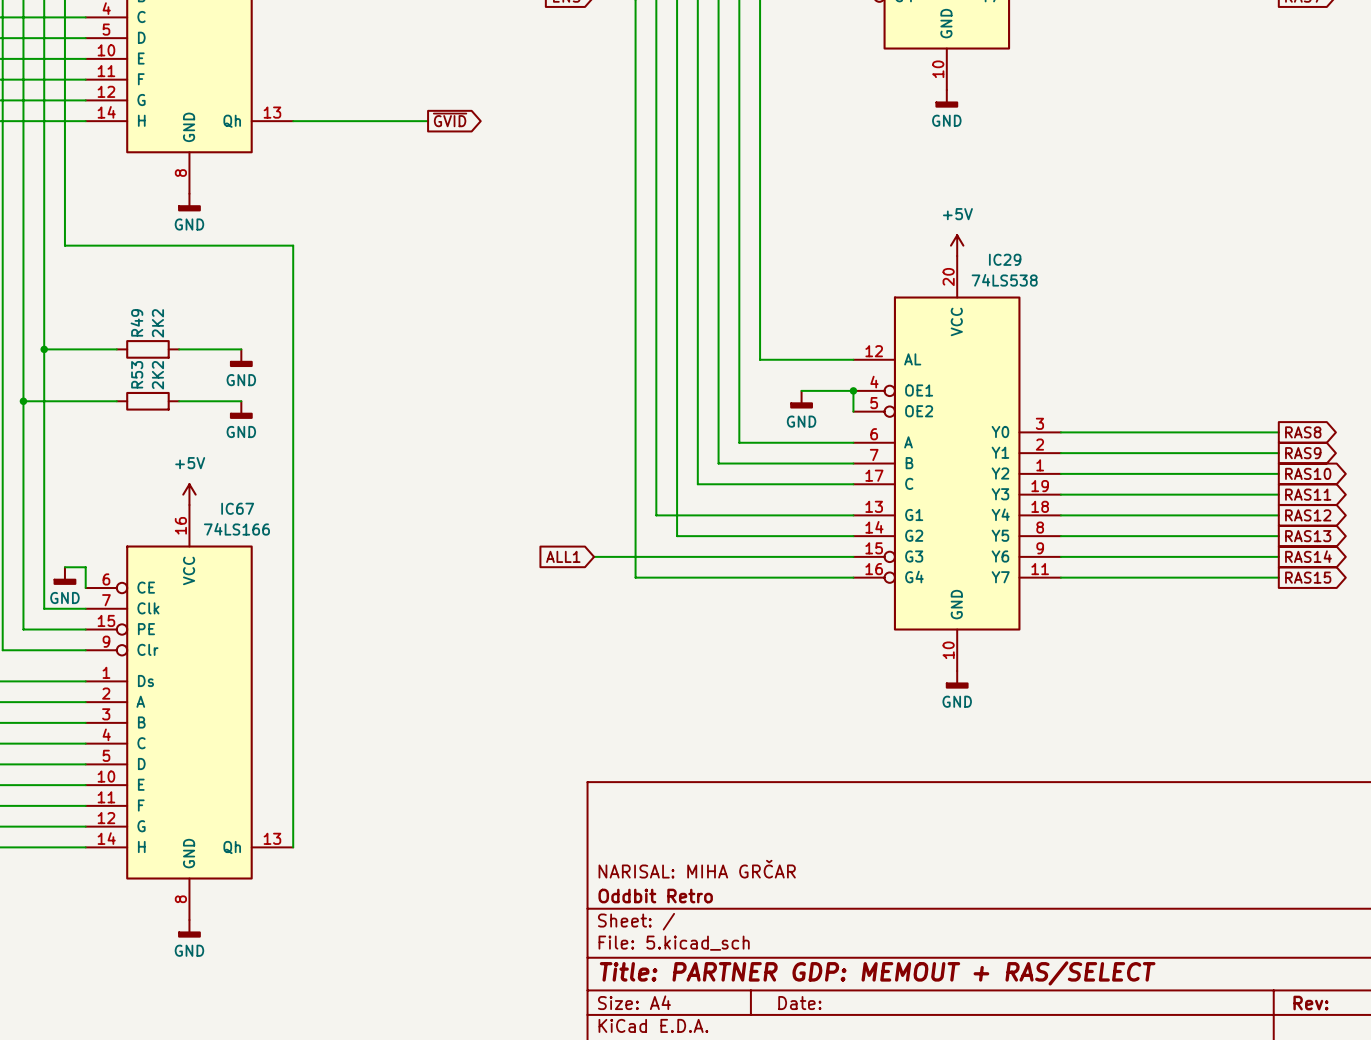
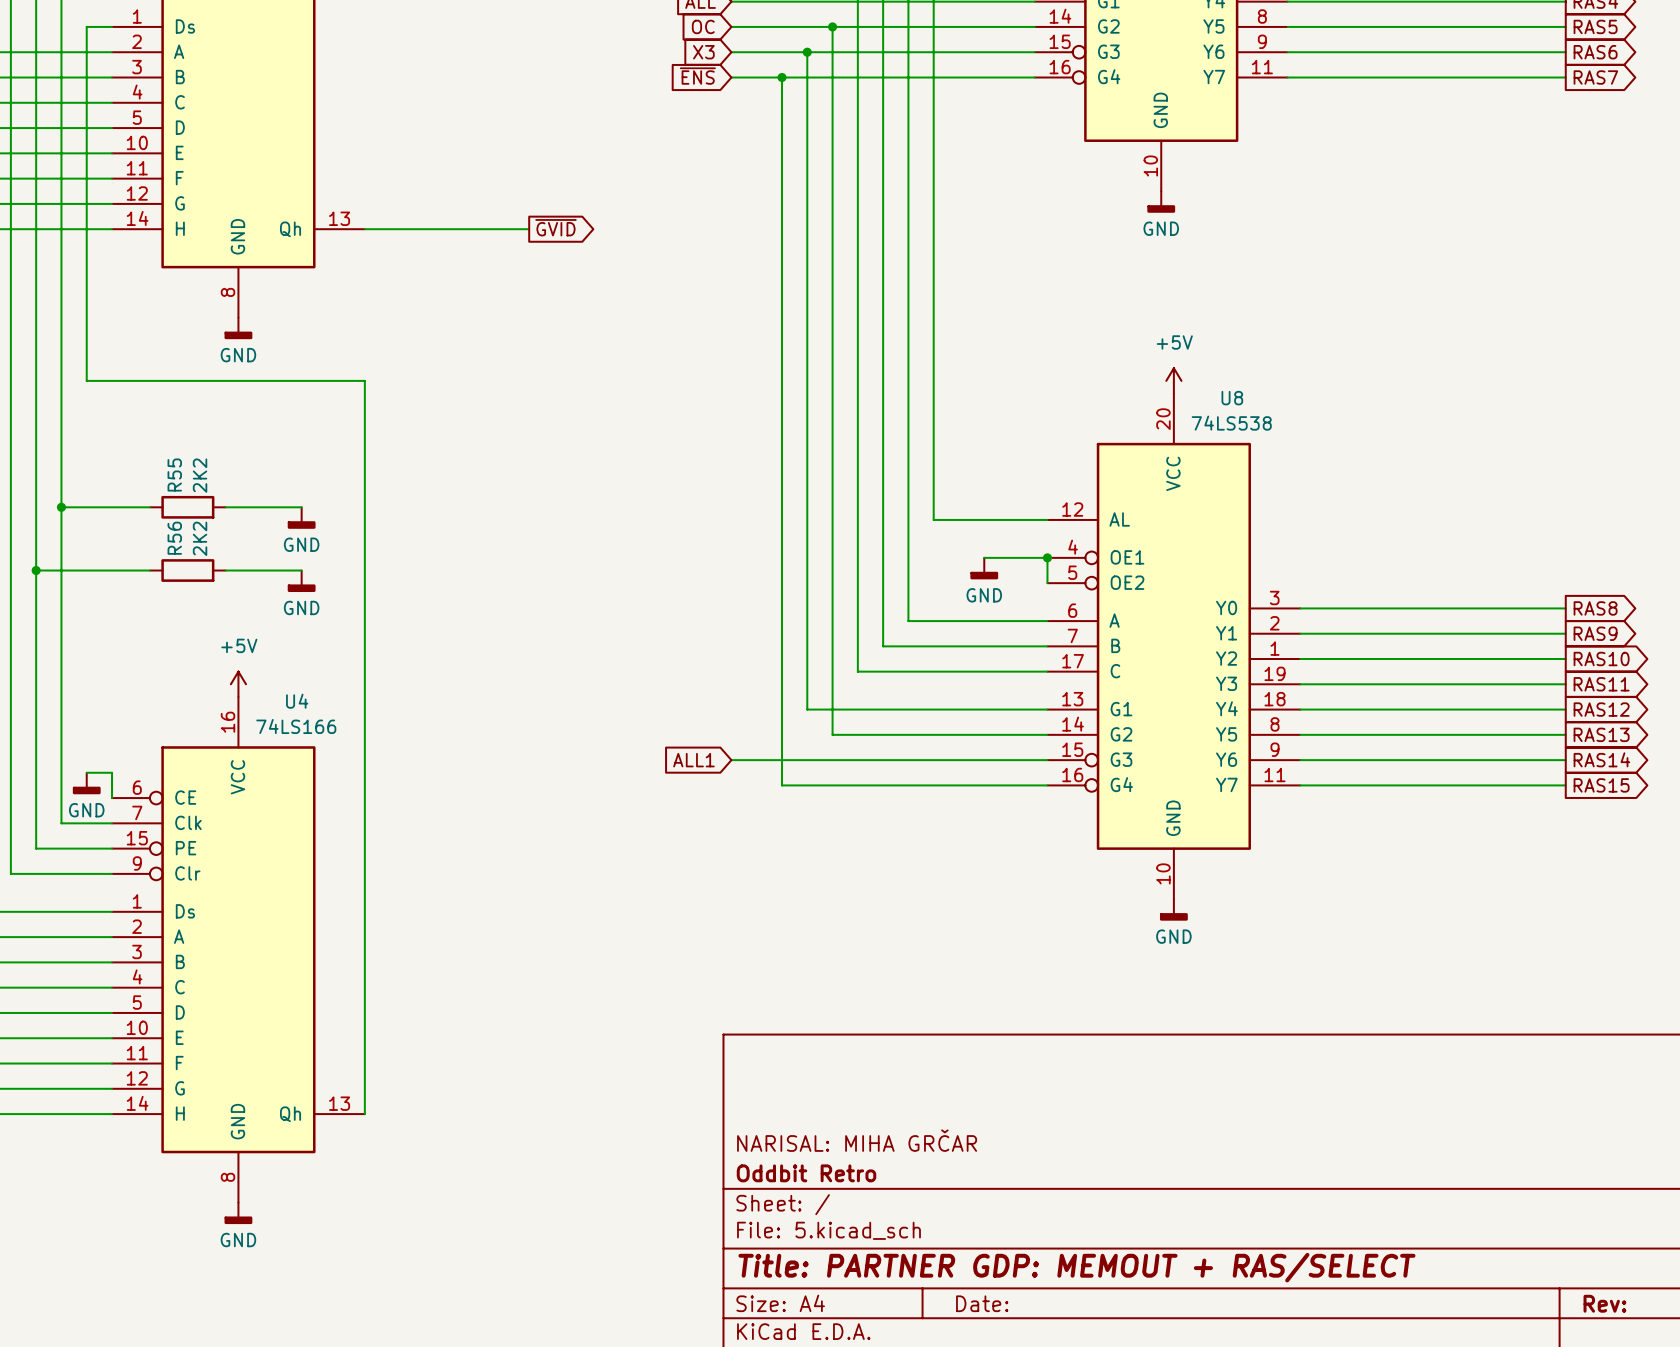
IC29 name: IC29 (1005, 259) -> U8 (1232, 398)
R49 name: R49 (136, 322) -> R55 (174, 475)
R53 name: R53 (137, 374) -> R56 (174, 538)
IC67 name: IC67 (237, 508) -> U4 (297, 701)

